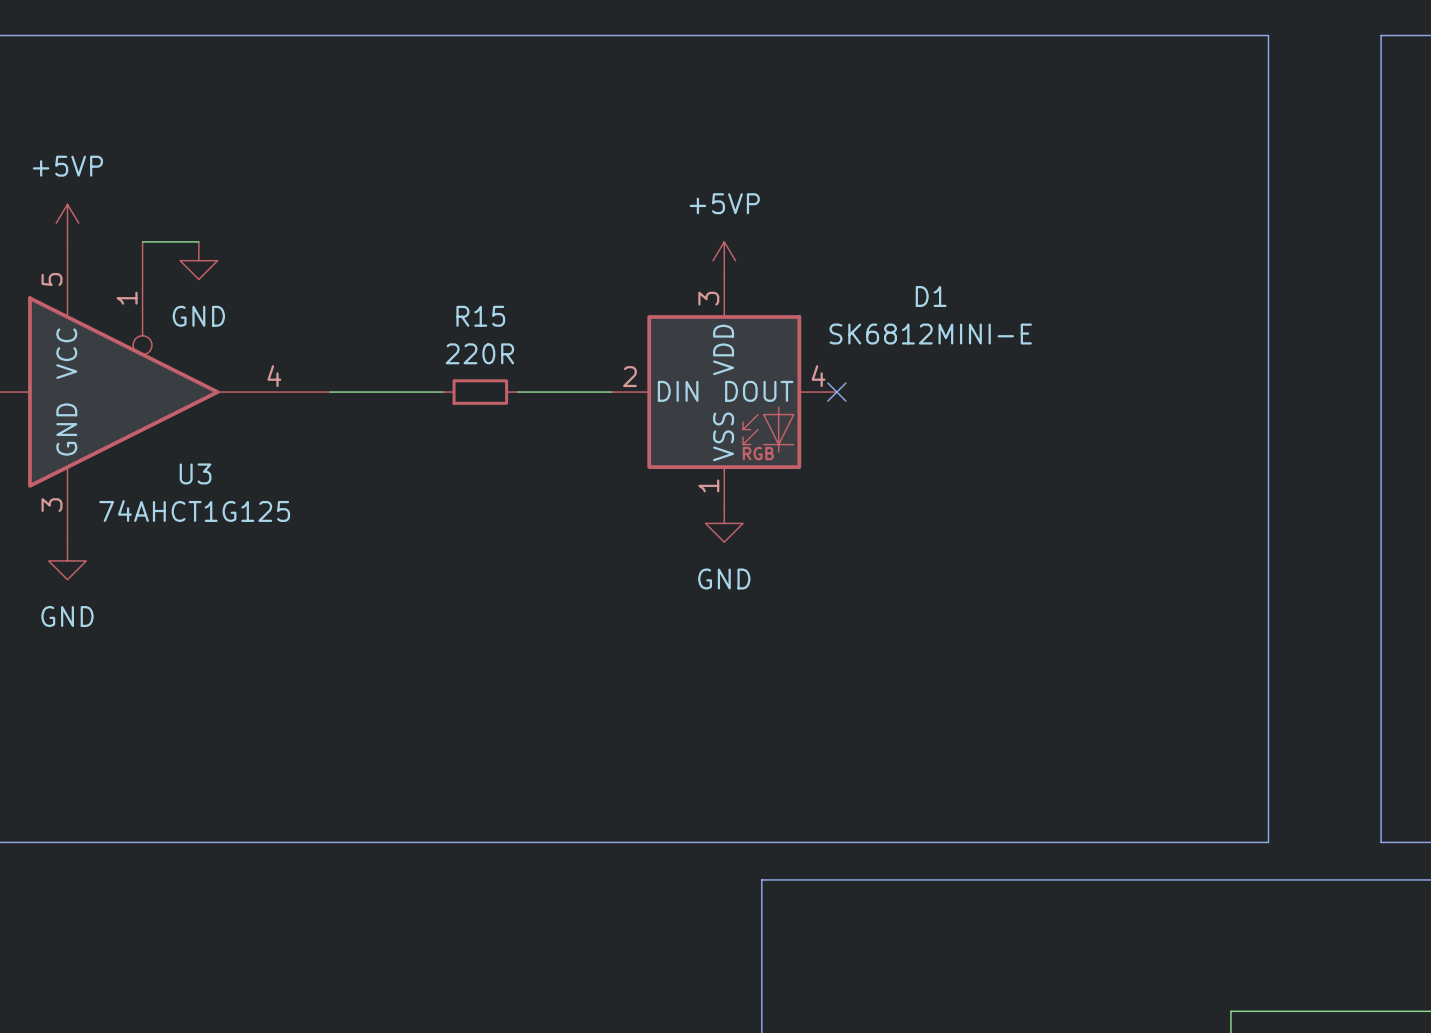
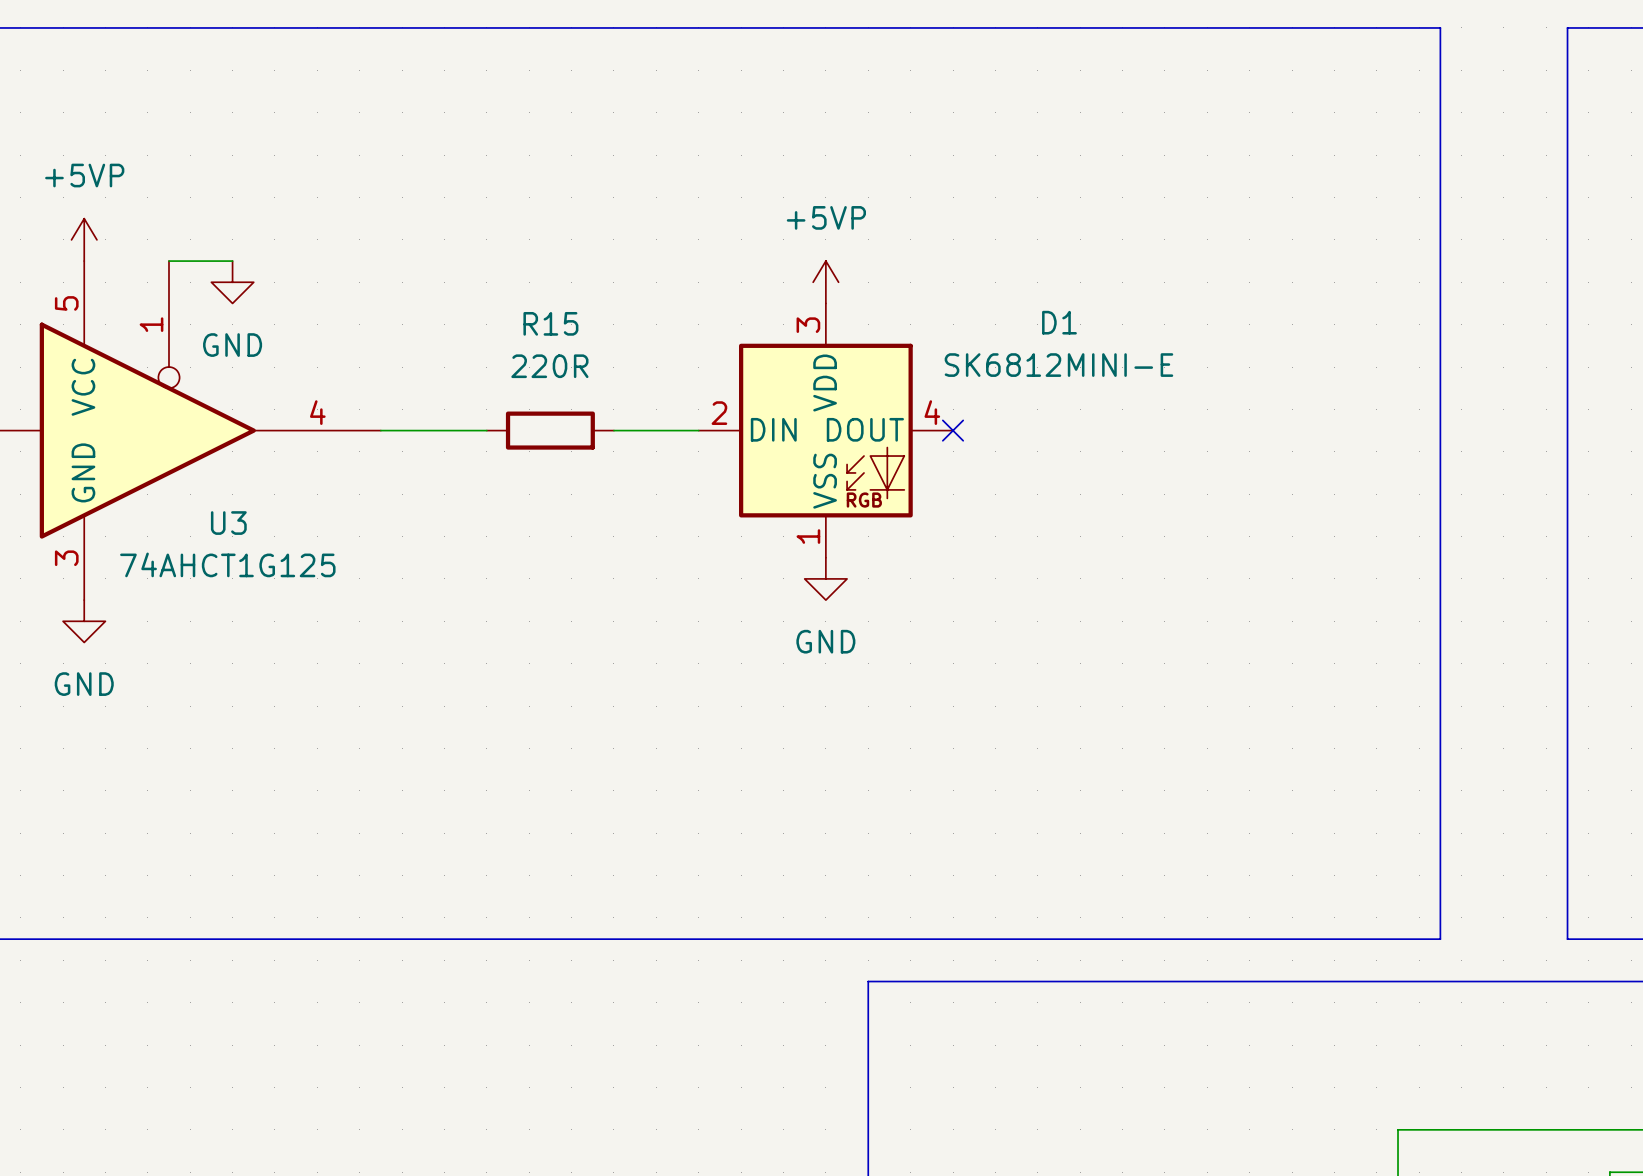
R15 symbol: [442, 379, 518, 405] -> [486, 411, 614, 450]

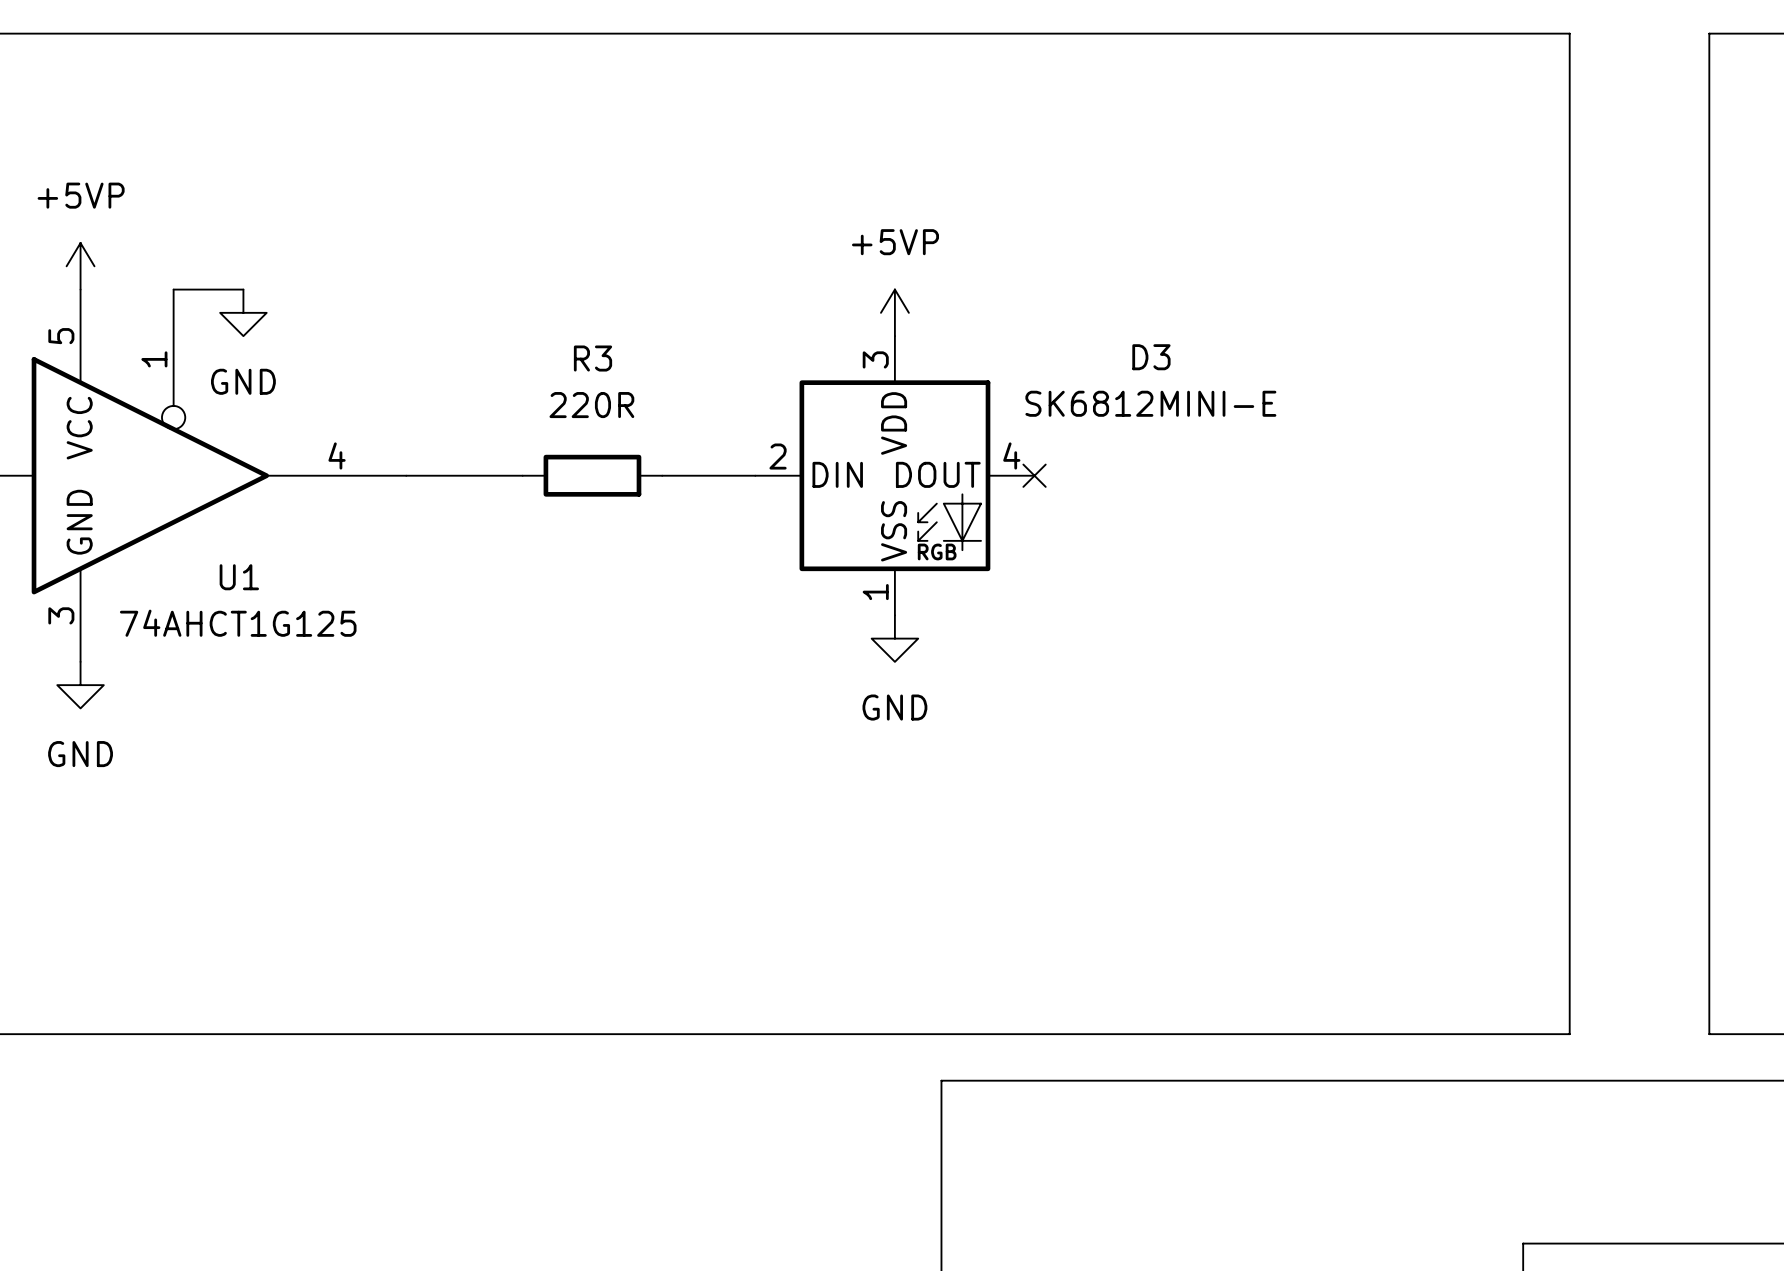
D1 name: D1 (1059, 322) -> D3 (1151, 357)
R15 name: R15 (550, 323) -> R3 (593, 358)
U3 name: U3 (228, 523) -> U1 (239, 577)

